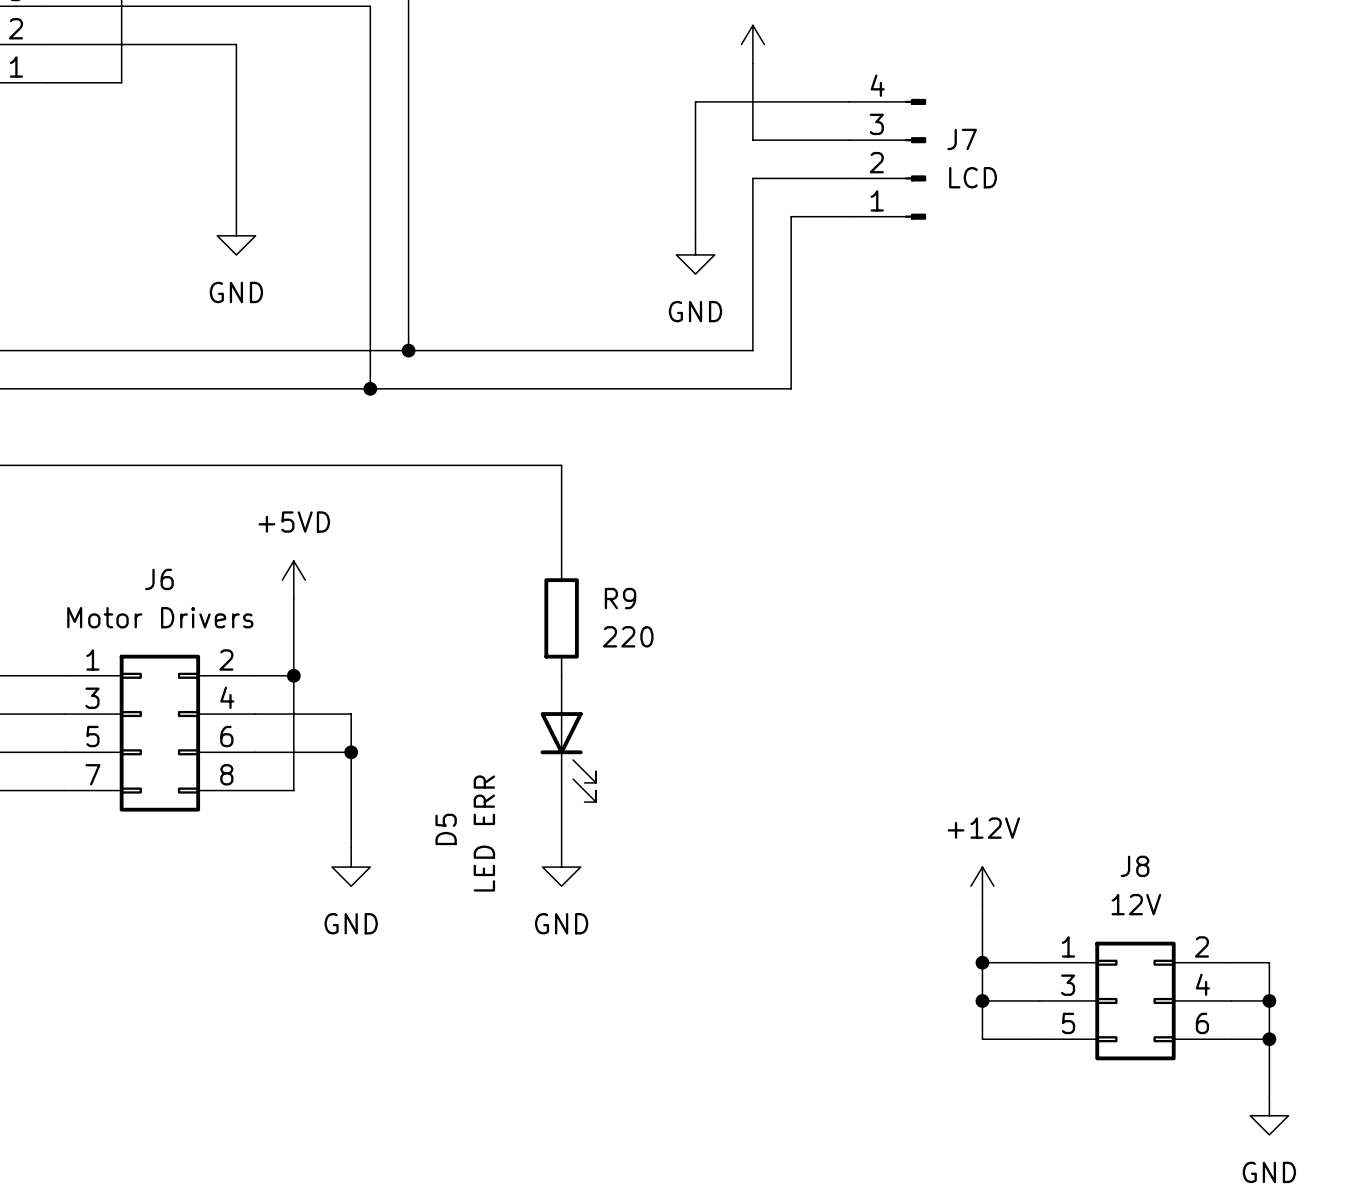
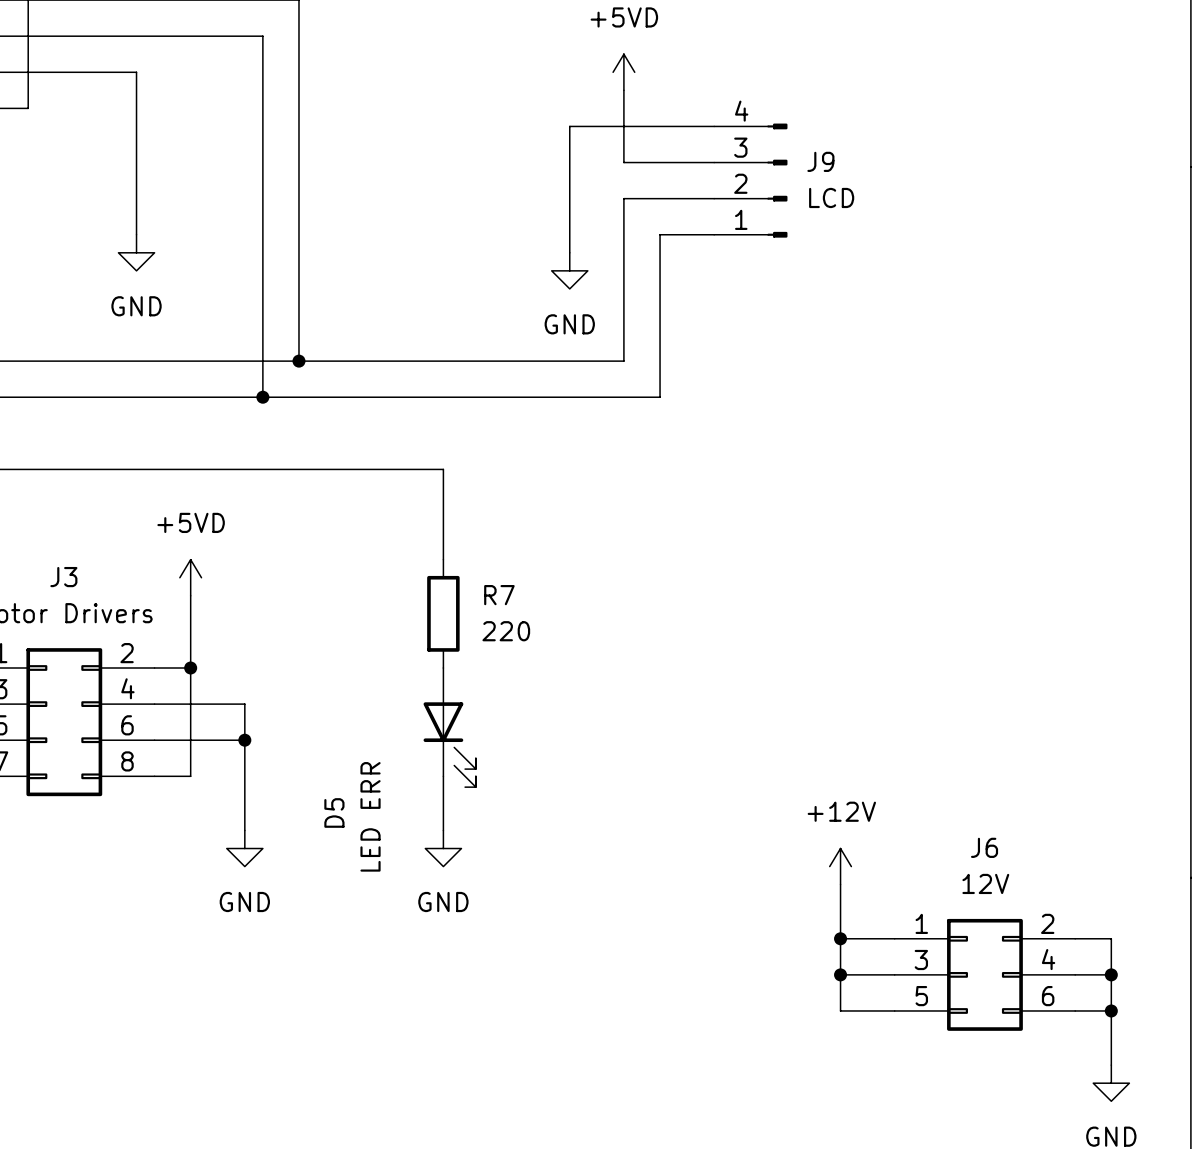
J7 name: J7 (962, 139) -> J9 (820, 161)
J6 name: J6 (159, 579) -> J3 (63, 577)
R9 name: R9 (620, 598) -> R7 (499, 595)
J8 name: J8 (1135, 866) -> J6 (984, 847)

